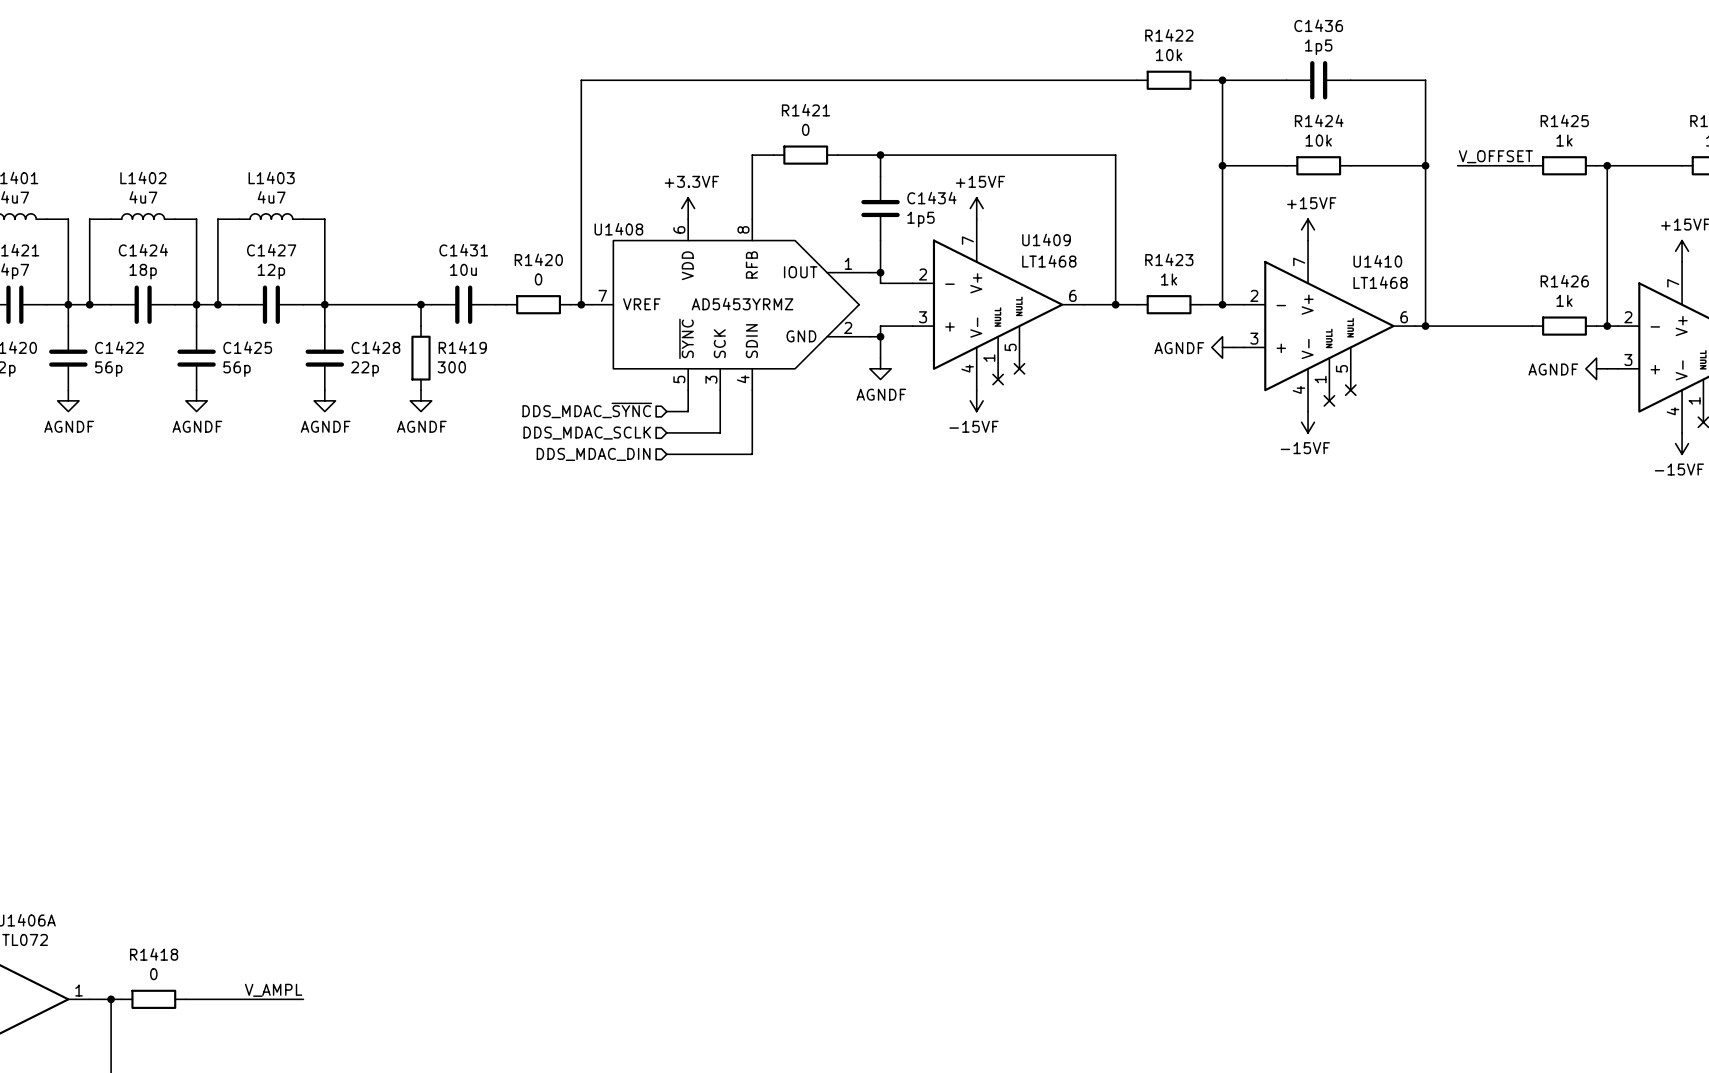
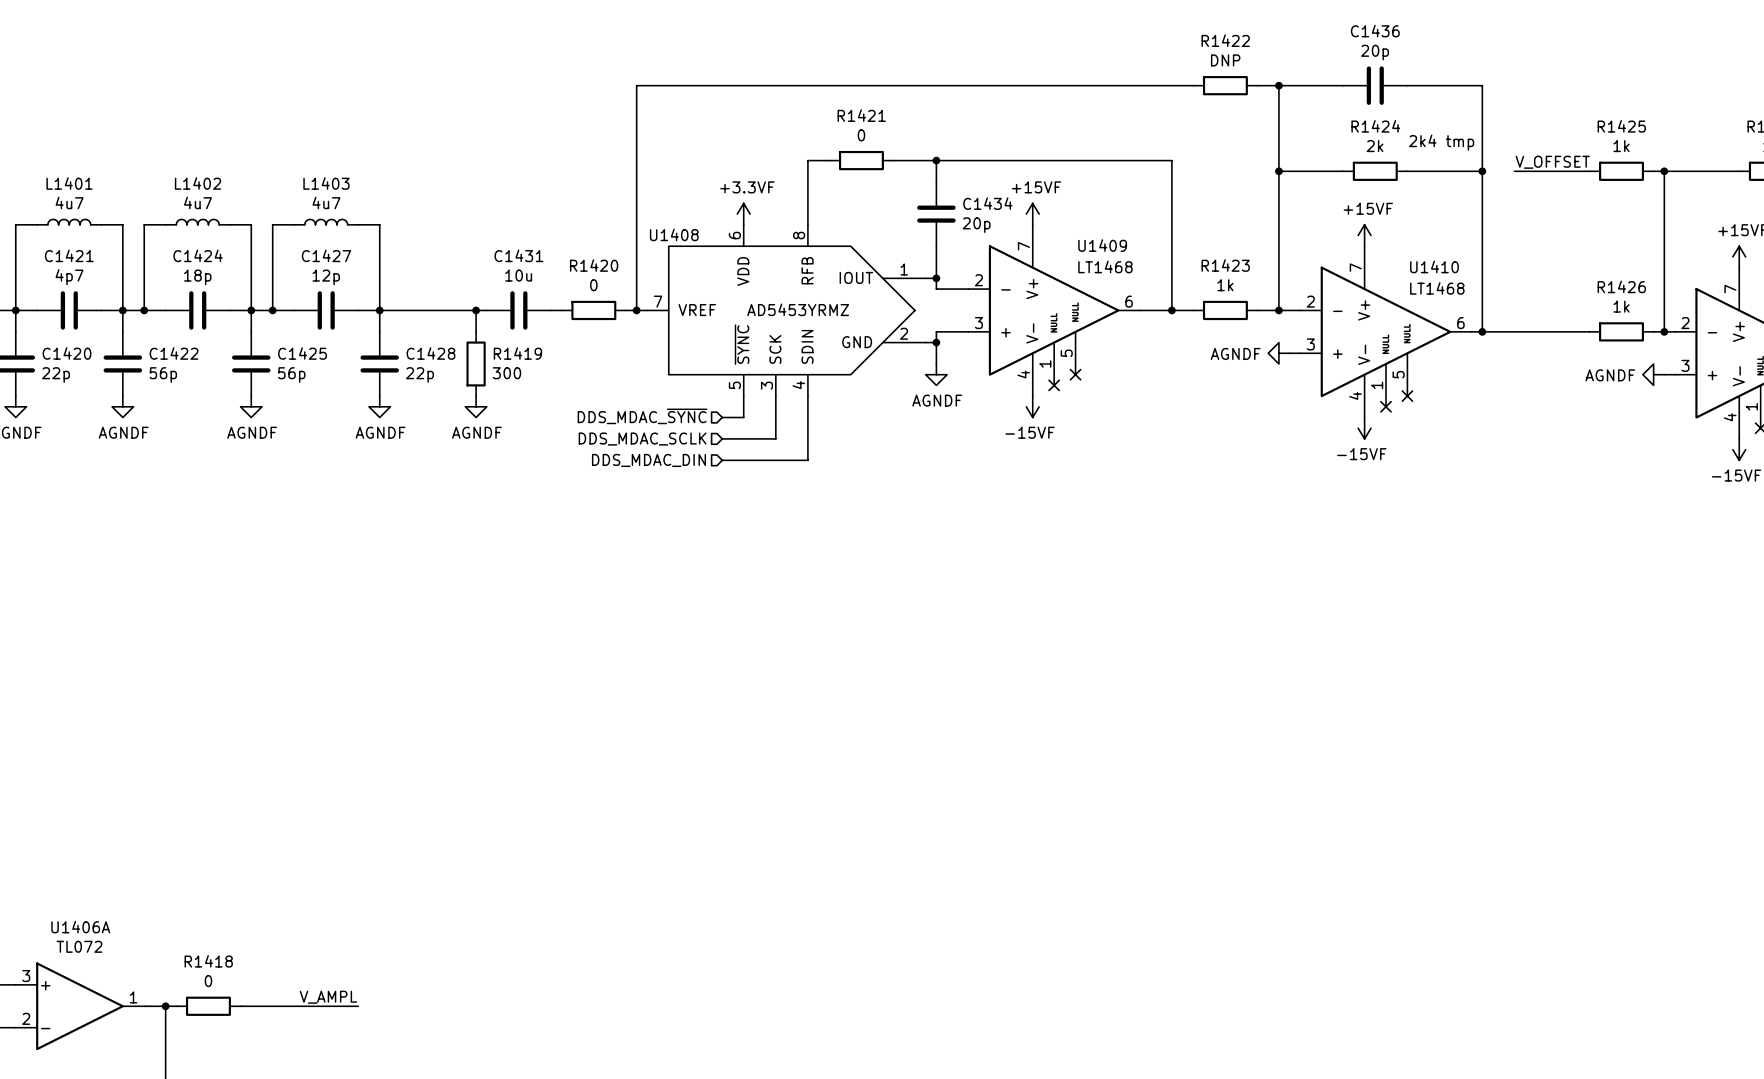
C1436 value: 1p5 (1318, 47) -> 20p (1375, 52)
R1422 value: 10k (1169, 55) -> DNP (1225, 60)
text: none -> 2k4 tmp (1441, 142)
R1424 value: 10k (1318, 140) -> 2k (1375, 146)
C1434 value: 1p5 (920, 219) -> 20p (976, 225)

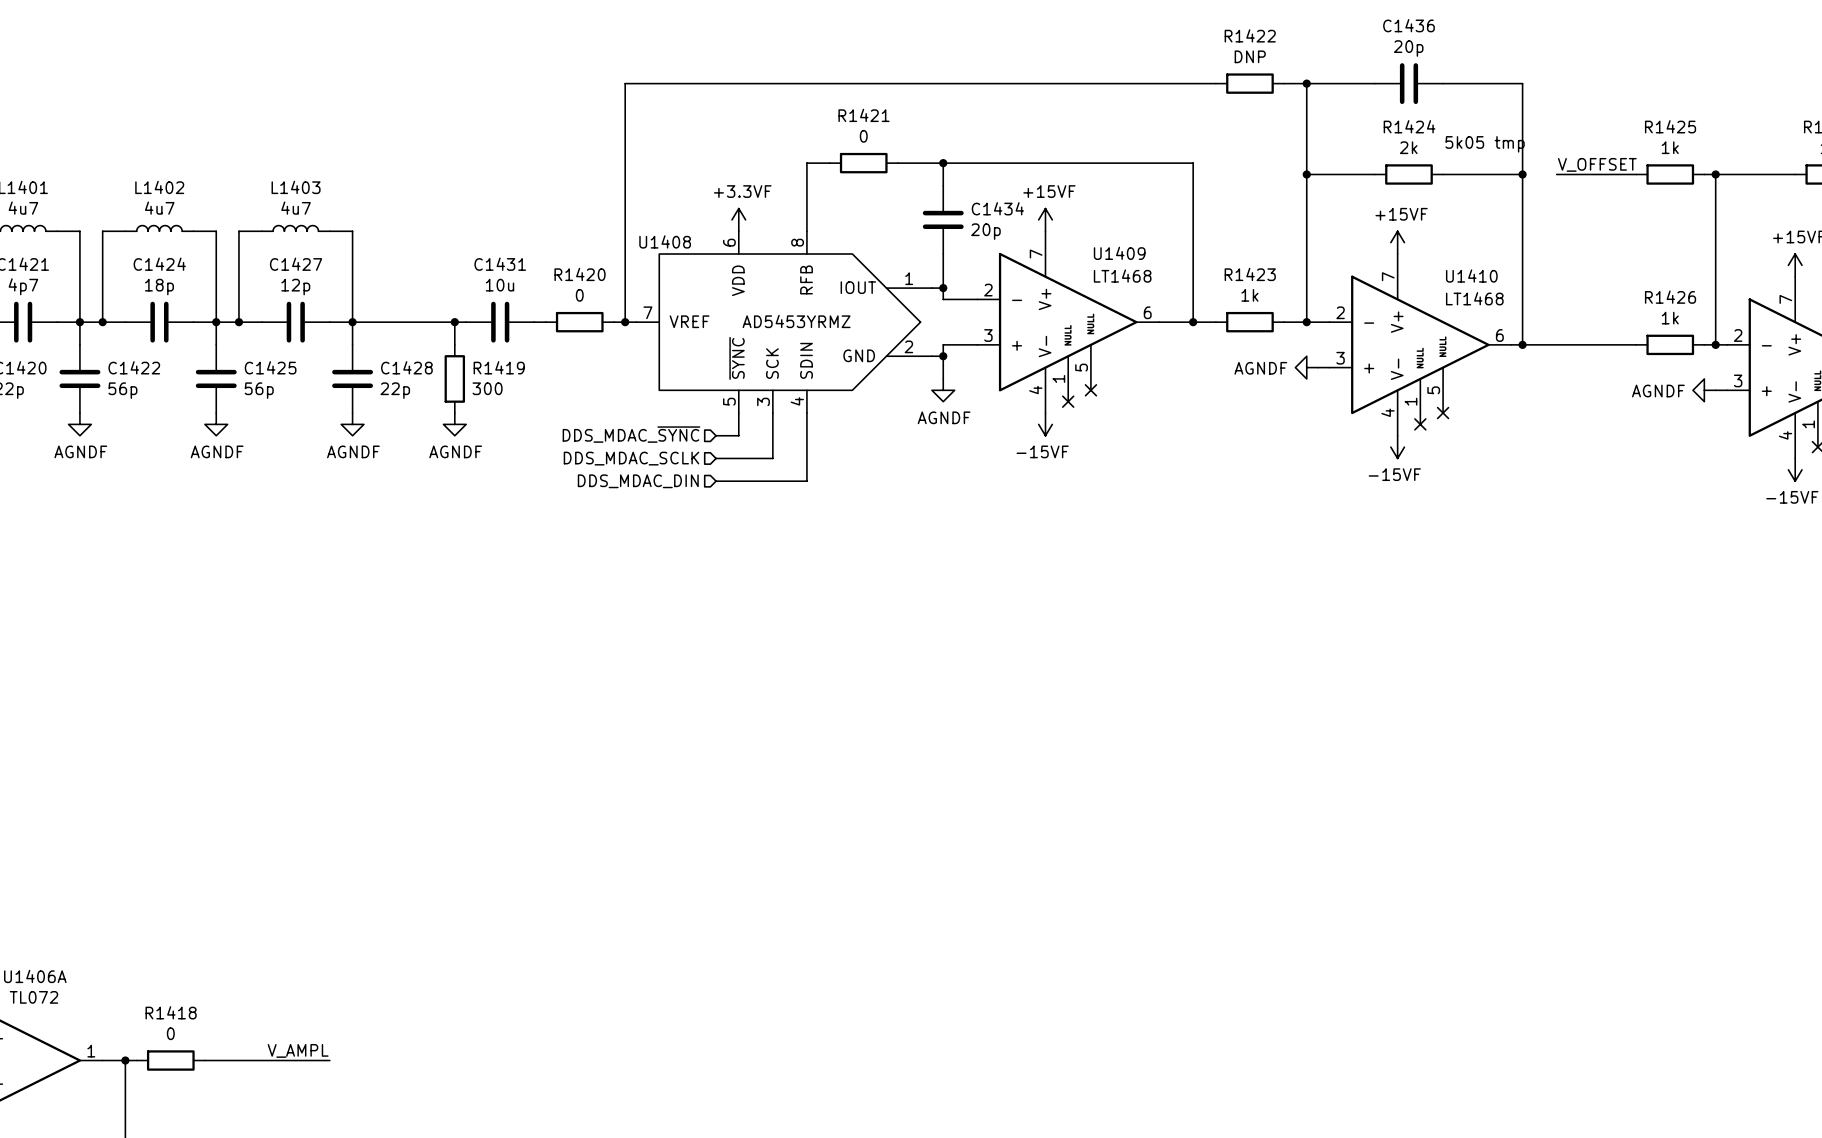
text: 2k4 tmp (1441, 142) -> 5k05 tmp (1485, 144)

